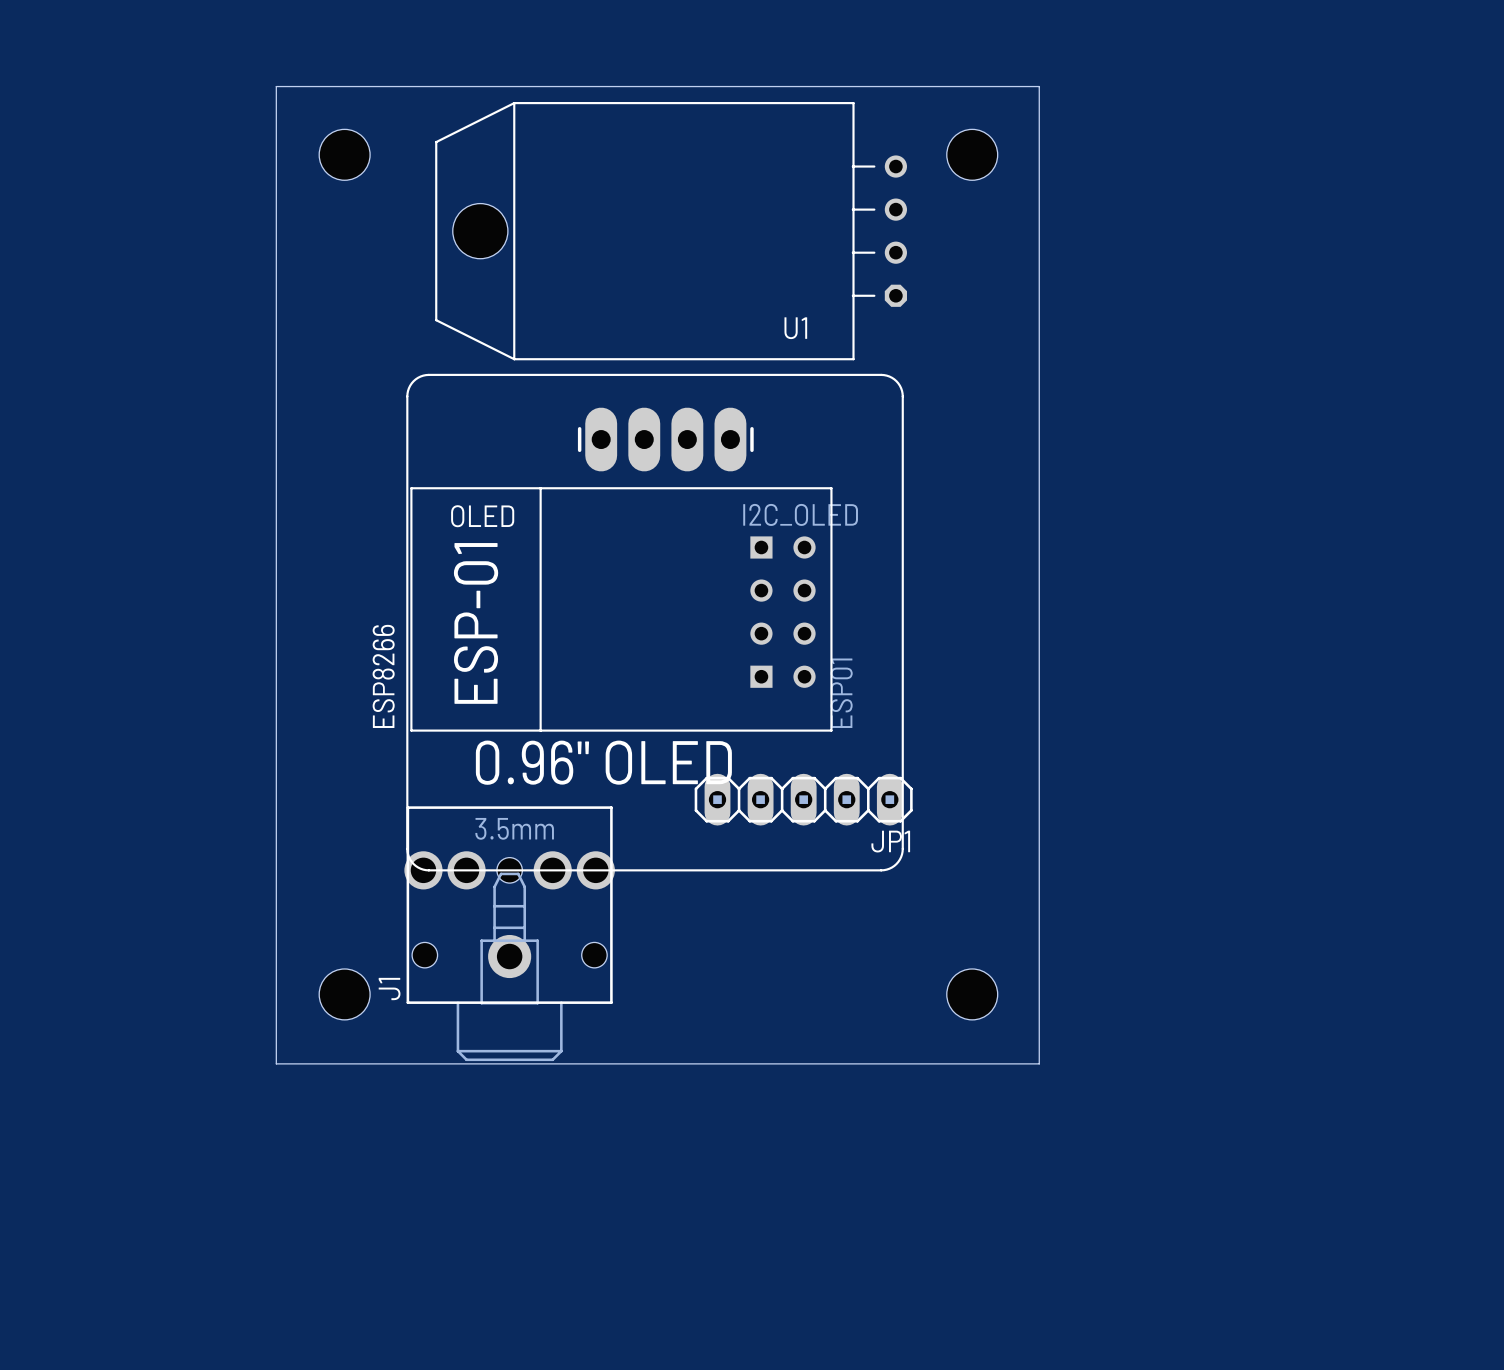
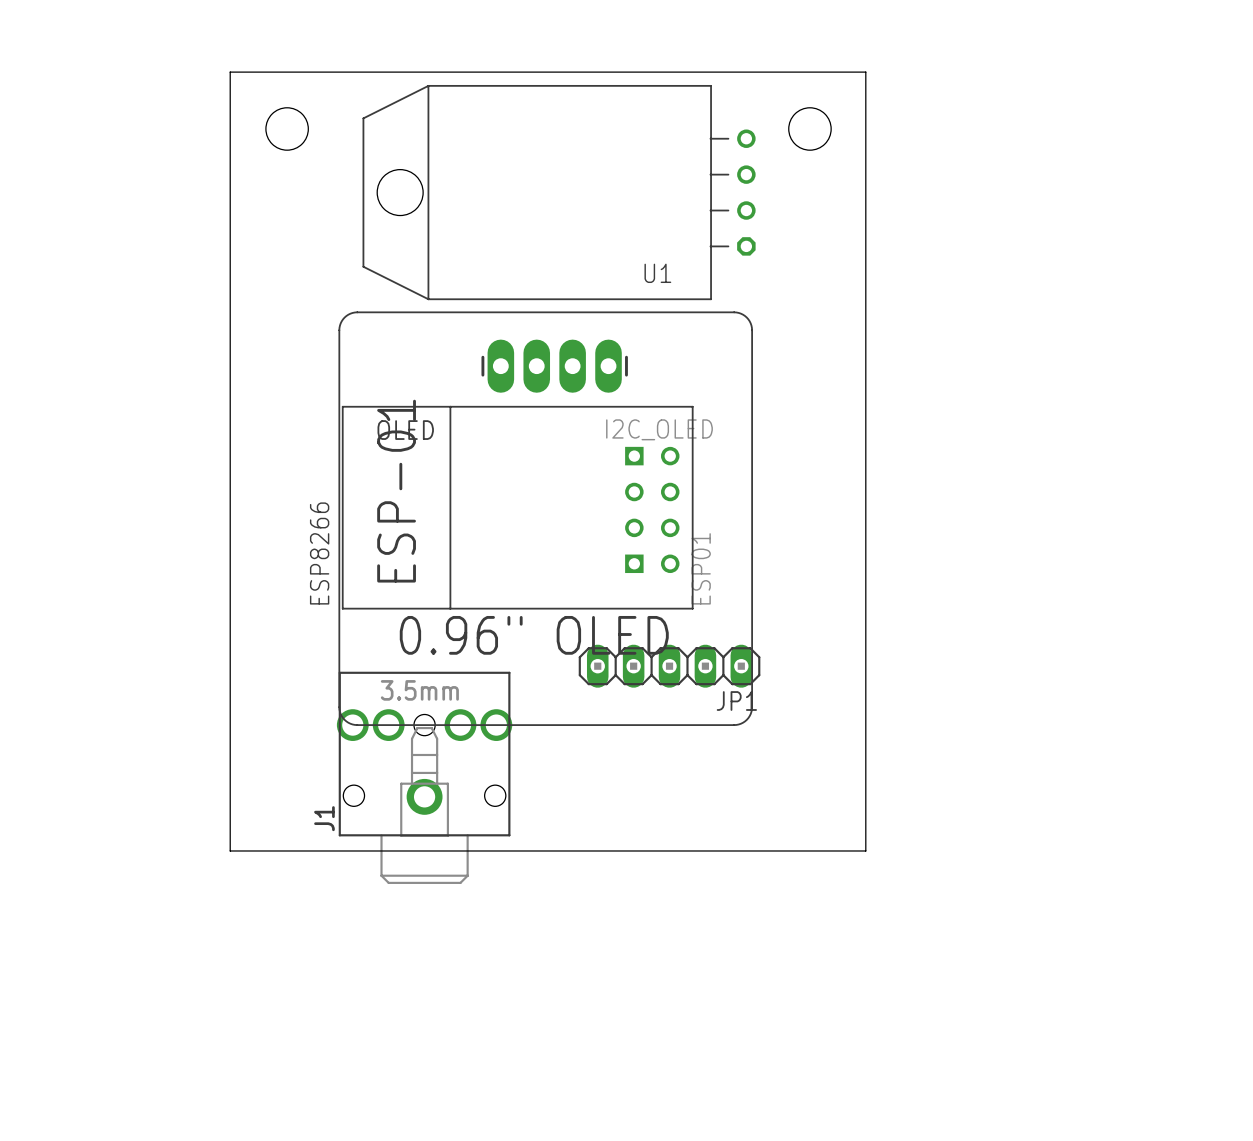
hole: (344, 994) -> none
hole: (972, 994) -> none
board edge: (276, 1021) (276, 1063) (1039, 1063) (1039, 1021) -> (230, 850) (865, 850)

